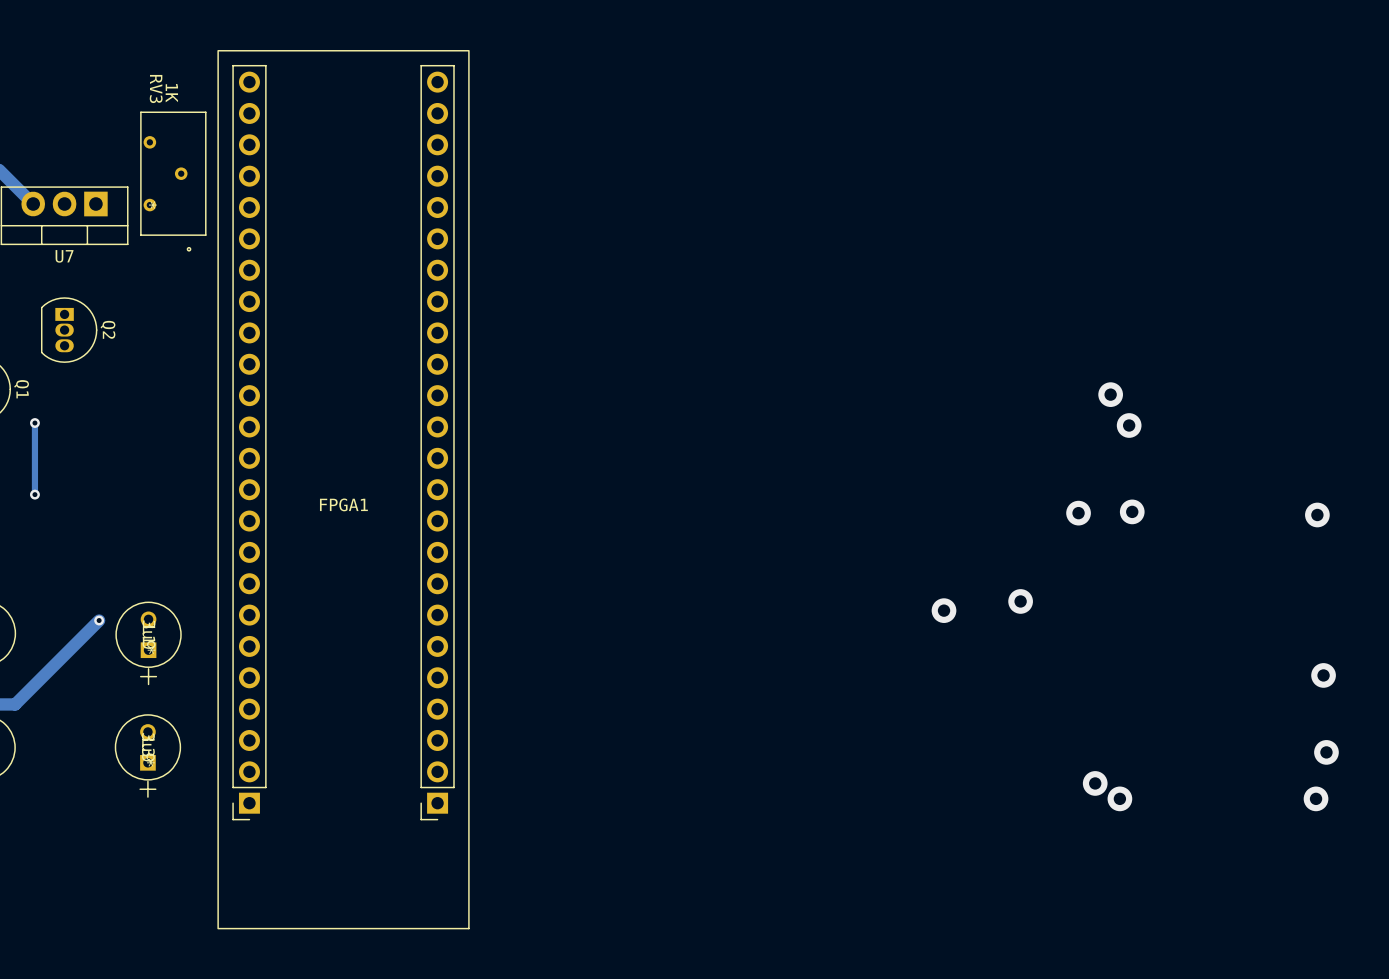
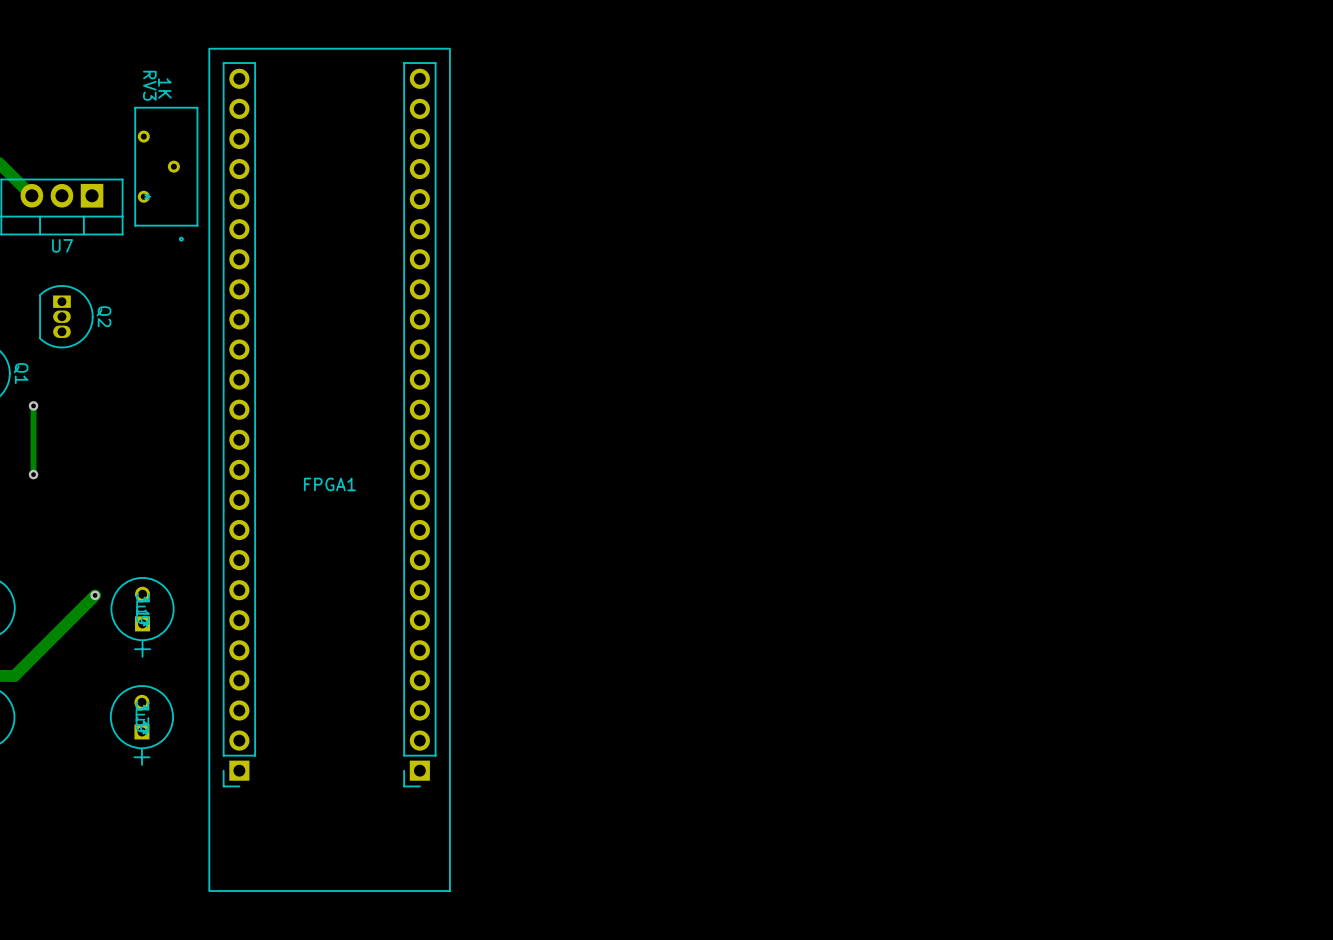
via: (1110, 394) -> none
via: (1129, 425) -> none
via: (1132, 511) -> none
via: (1078, 513) -> none
via: (1317, 514) -> none
via: (1020, 601) -> none
via: (944, 610) -> none
via: (1323, 675) -> none
via: (1326, 752) -> none
via: (1095, 783) -> none
via: (1119, 798) -> none
via: (1316, 798) -> none

